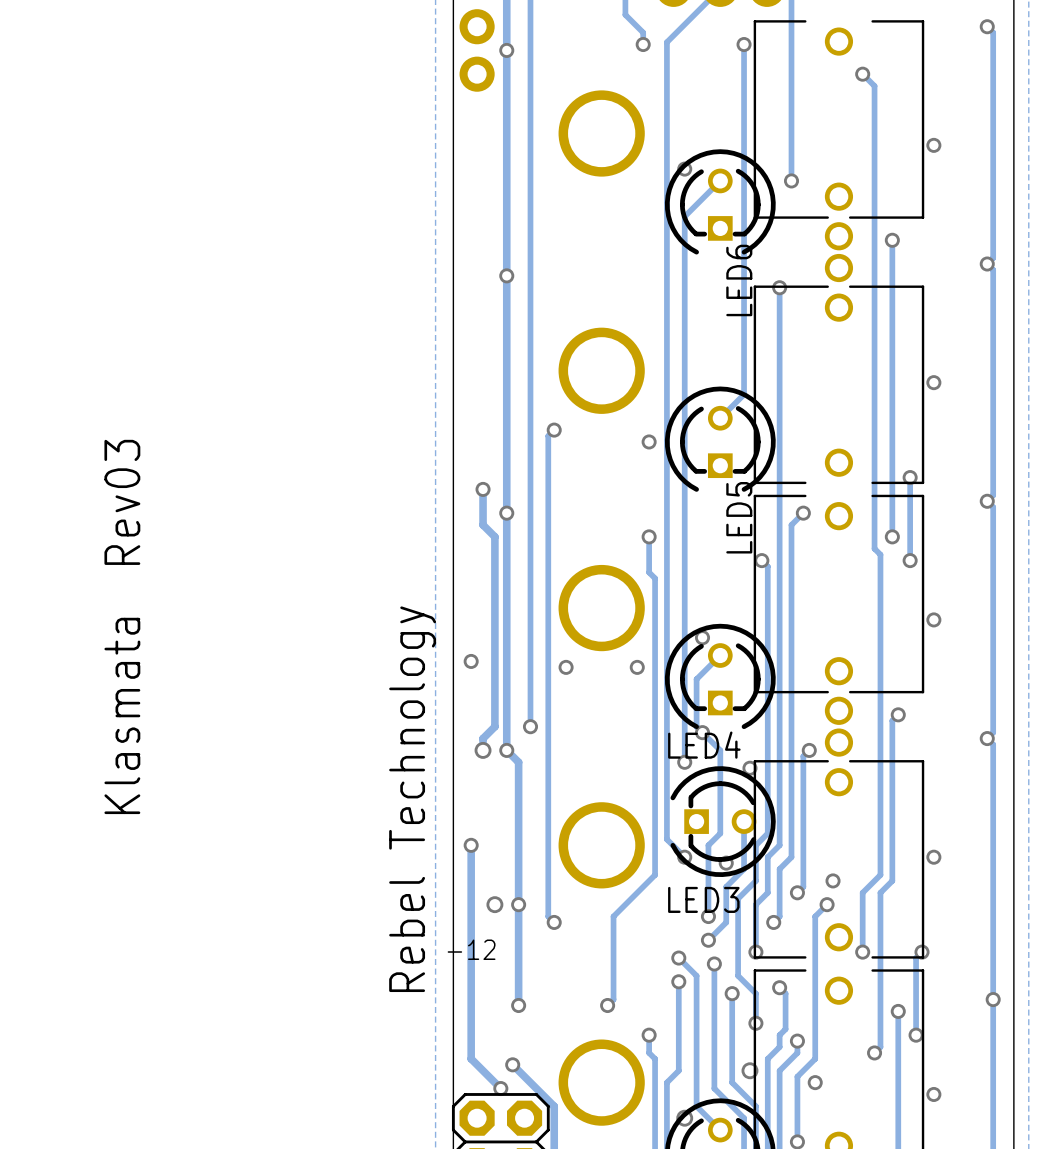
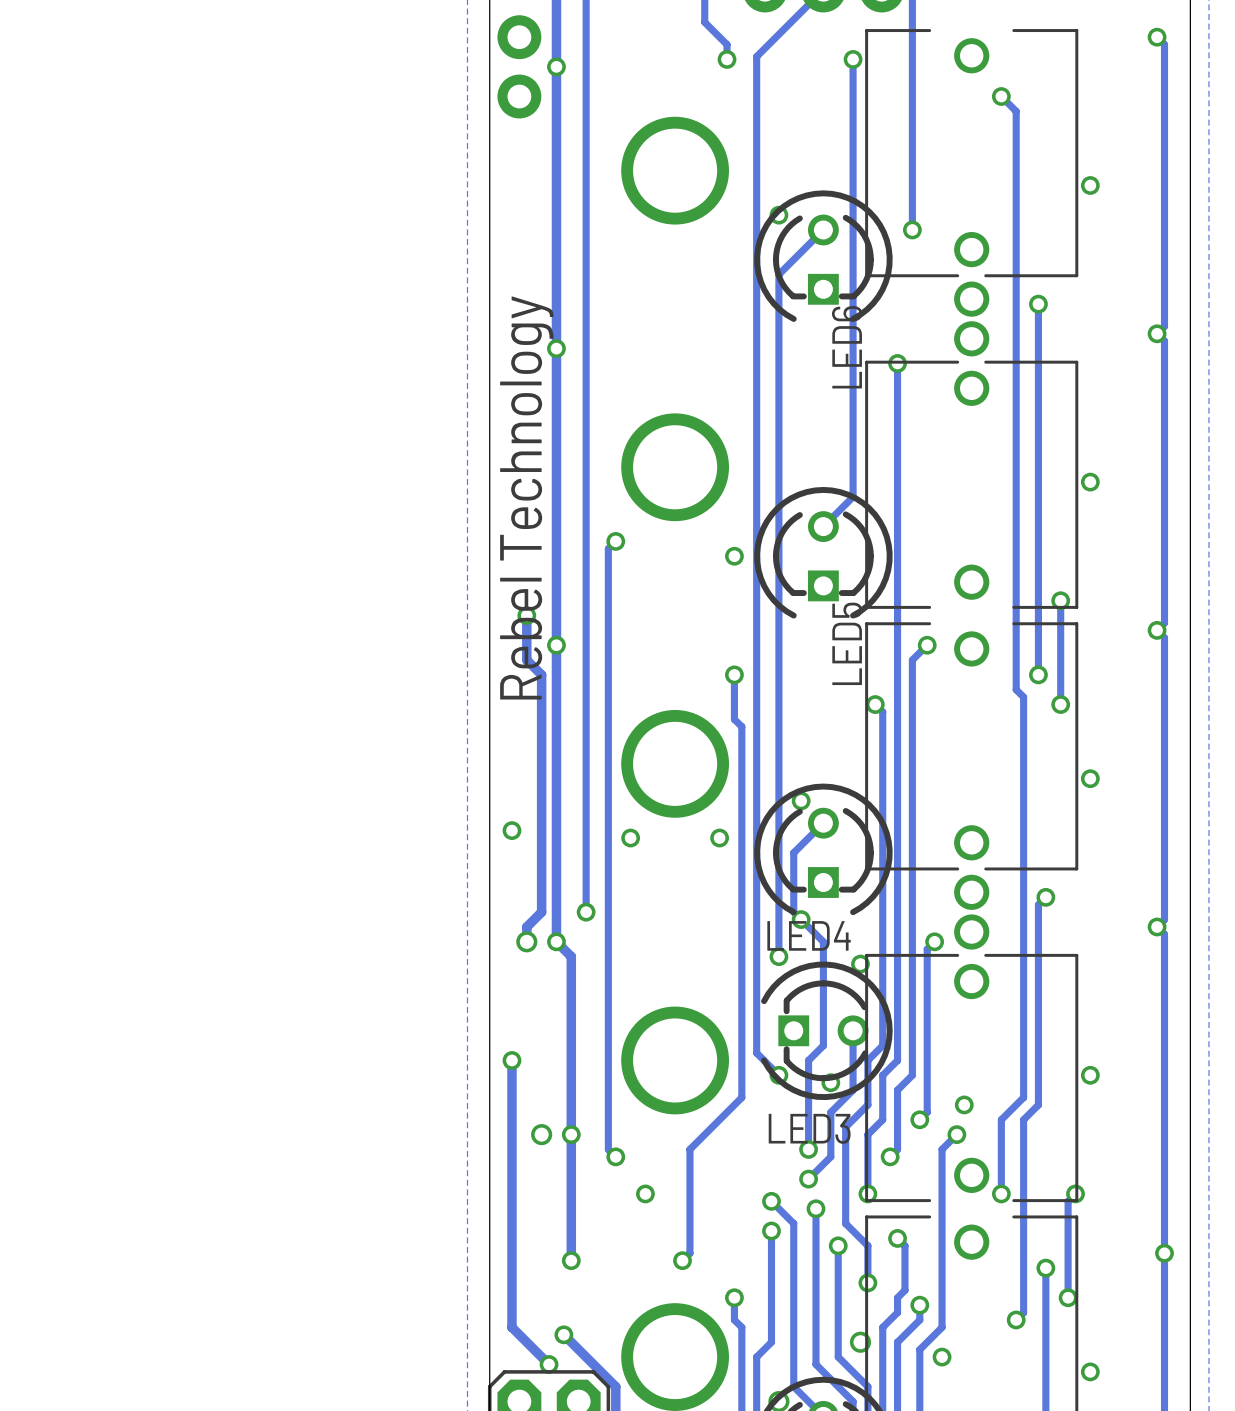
text: Rev03 (122, 502) -> none
text: Klasmata (122, 715) -> none
text position: Rebel Technology (412, 799) -> Rebel Technology (526, 497)
text: -12 (471, 949) -> none
via: none -> (645, 1193)

